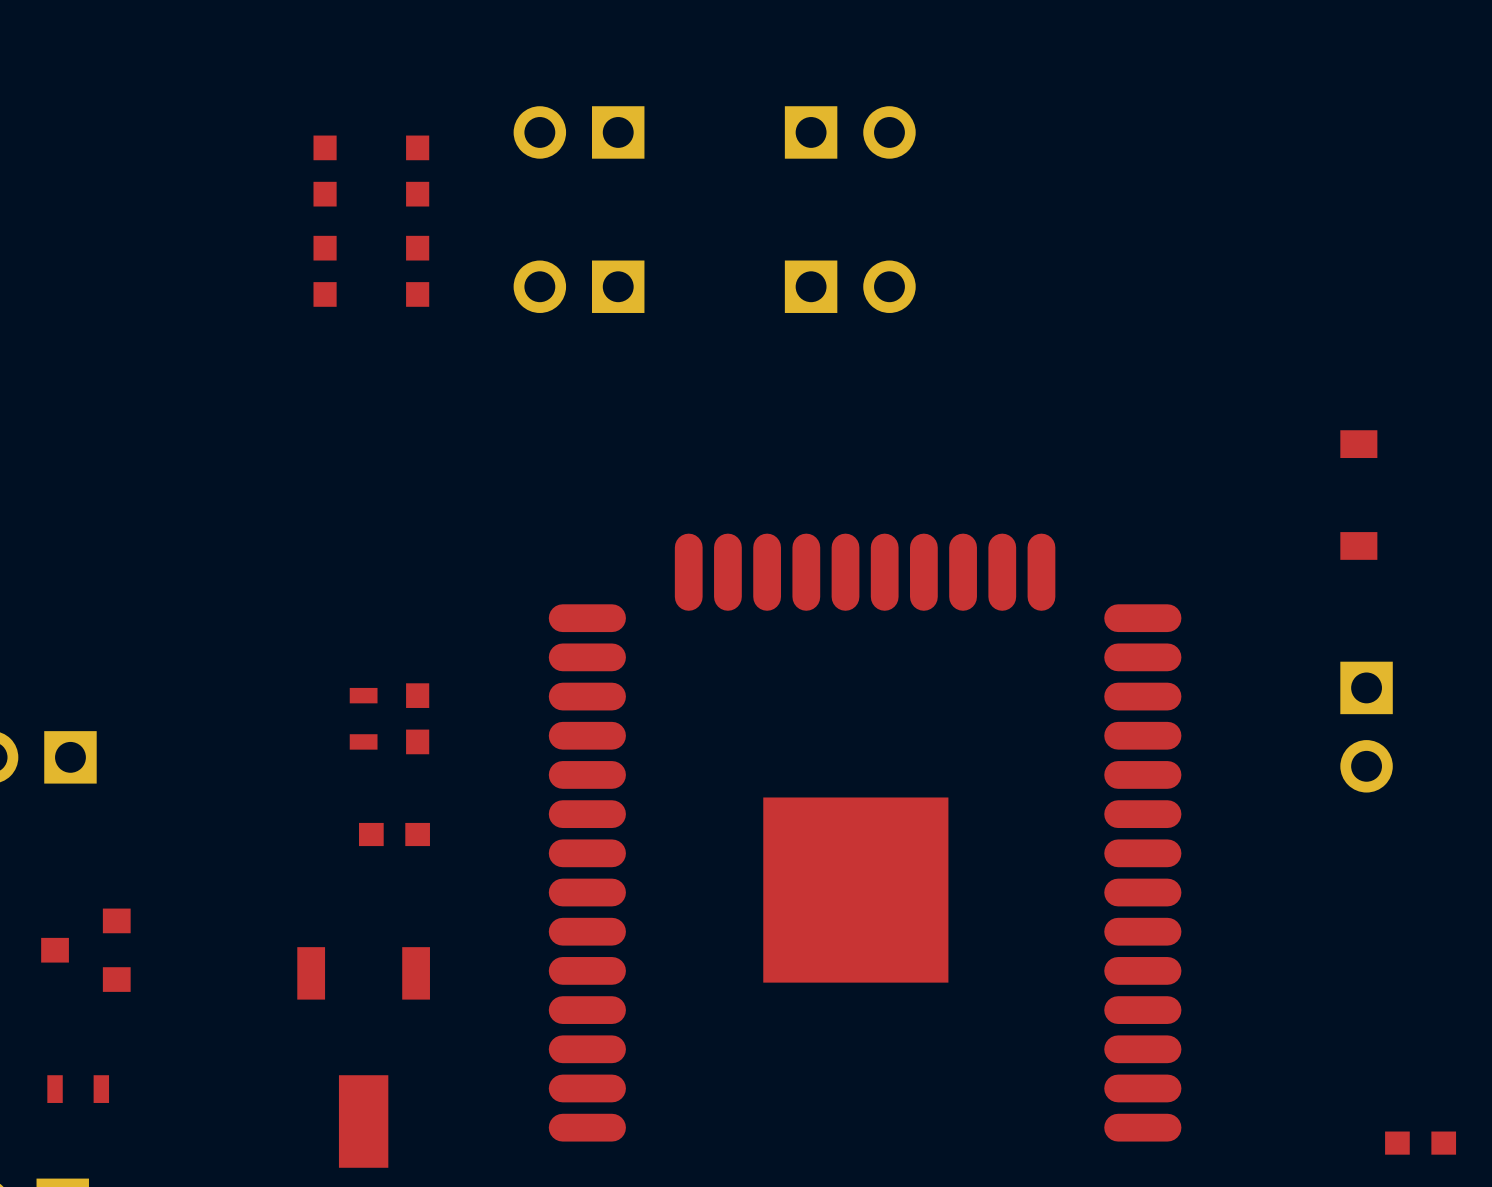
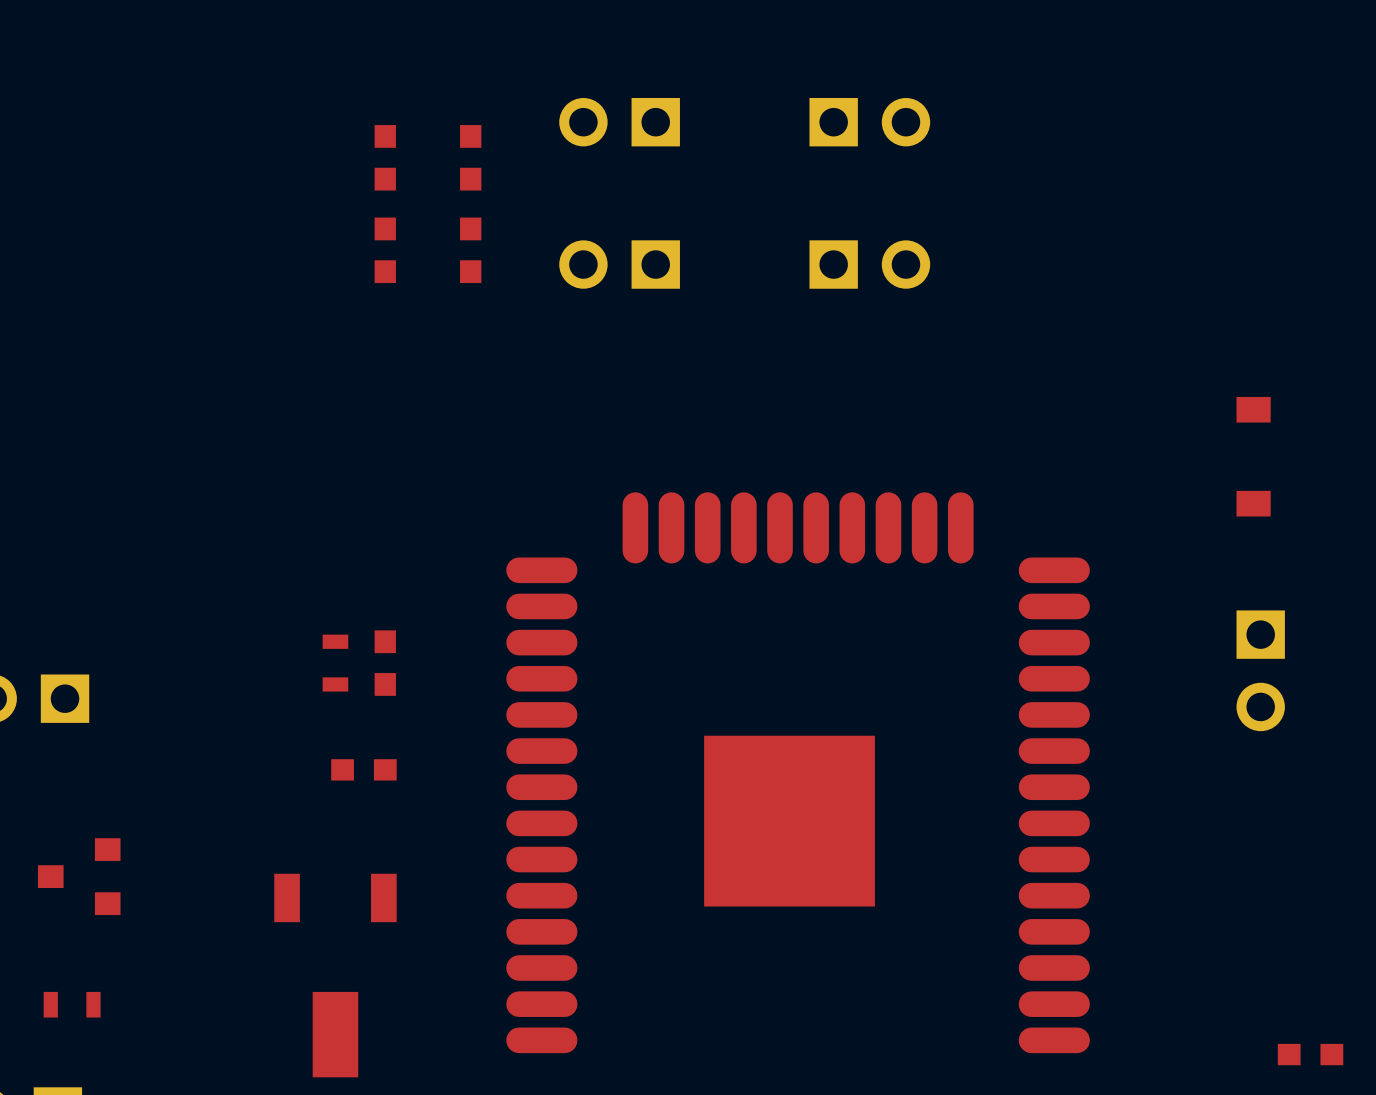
part: (579, 132) -> none
part: none -> (619, 122)
part: (850, 132) -> none
part: none -> (869, 122)
part: (325, 171) -> none
part: none -> (470, 157)
part: (325, 271) -> none
part: none -> (470, 250)
part: (579, 286) -> none
part: none -> (619, 264)
part: (850, 286) -> none
part: none -> (869, 264)

